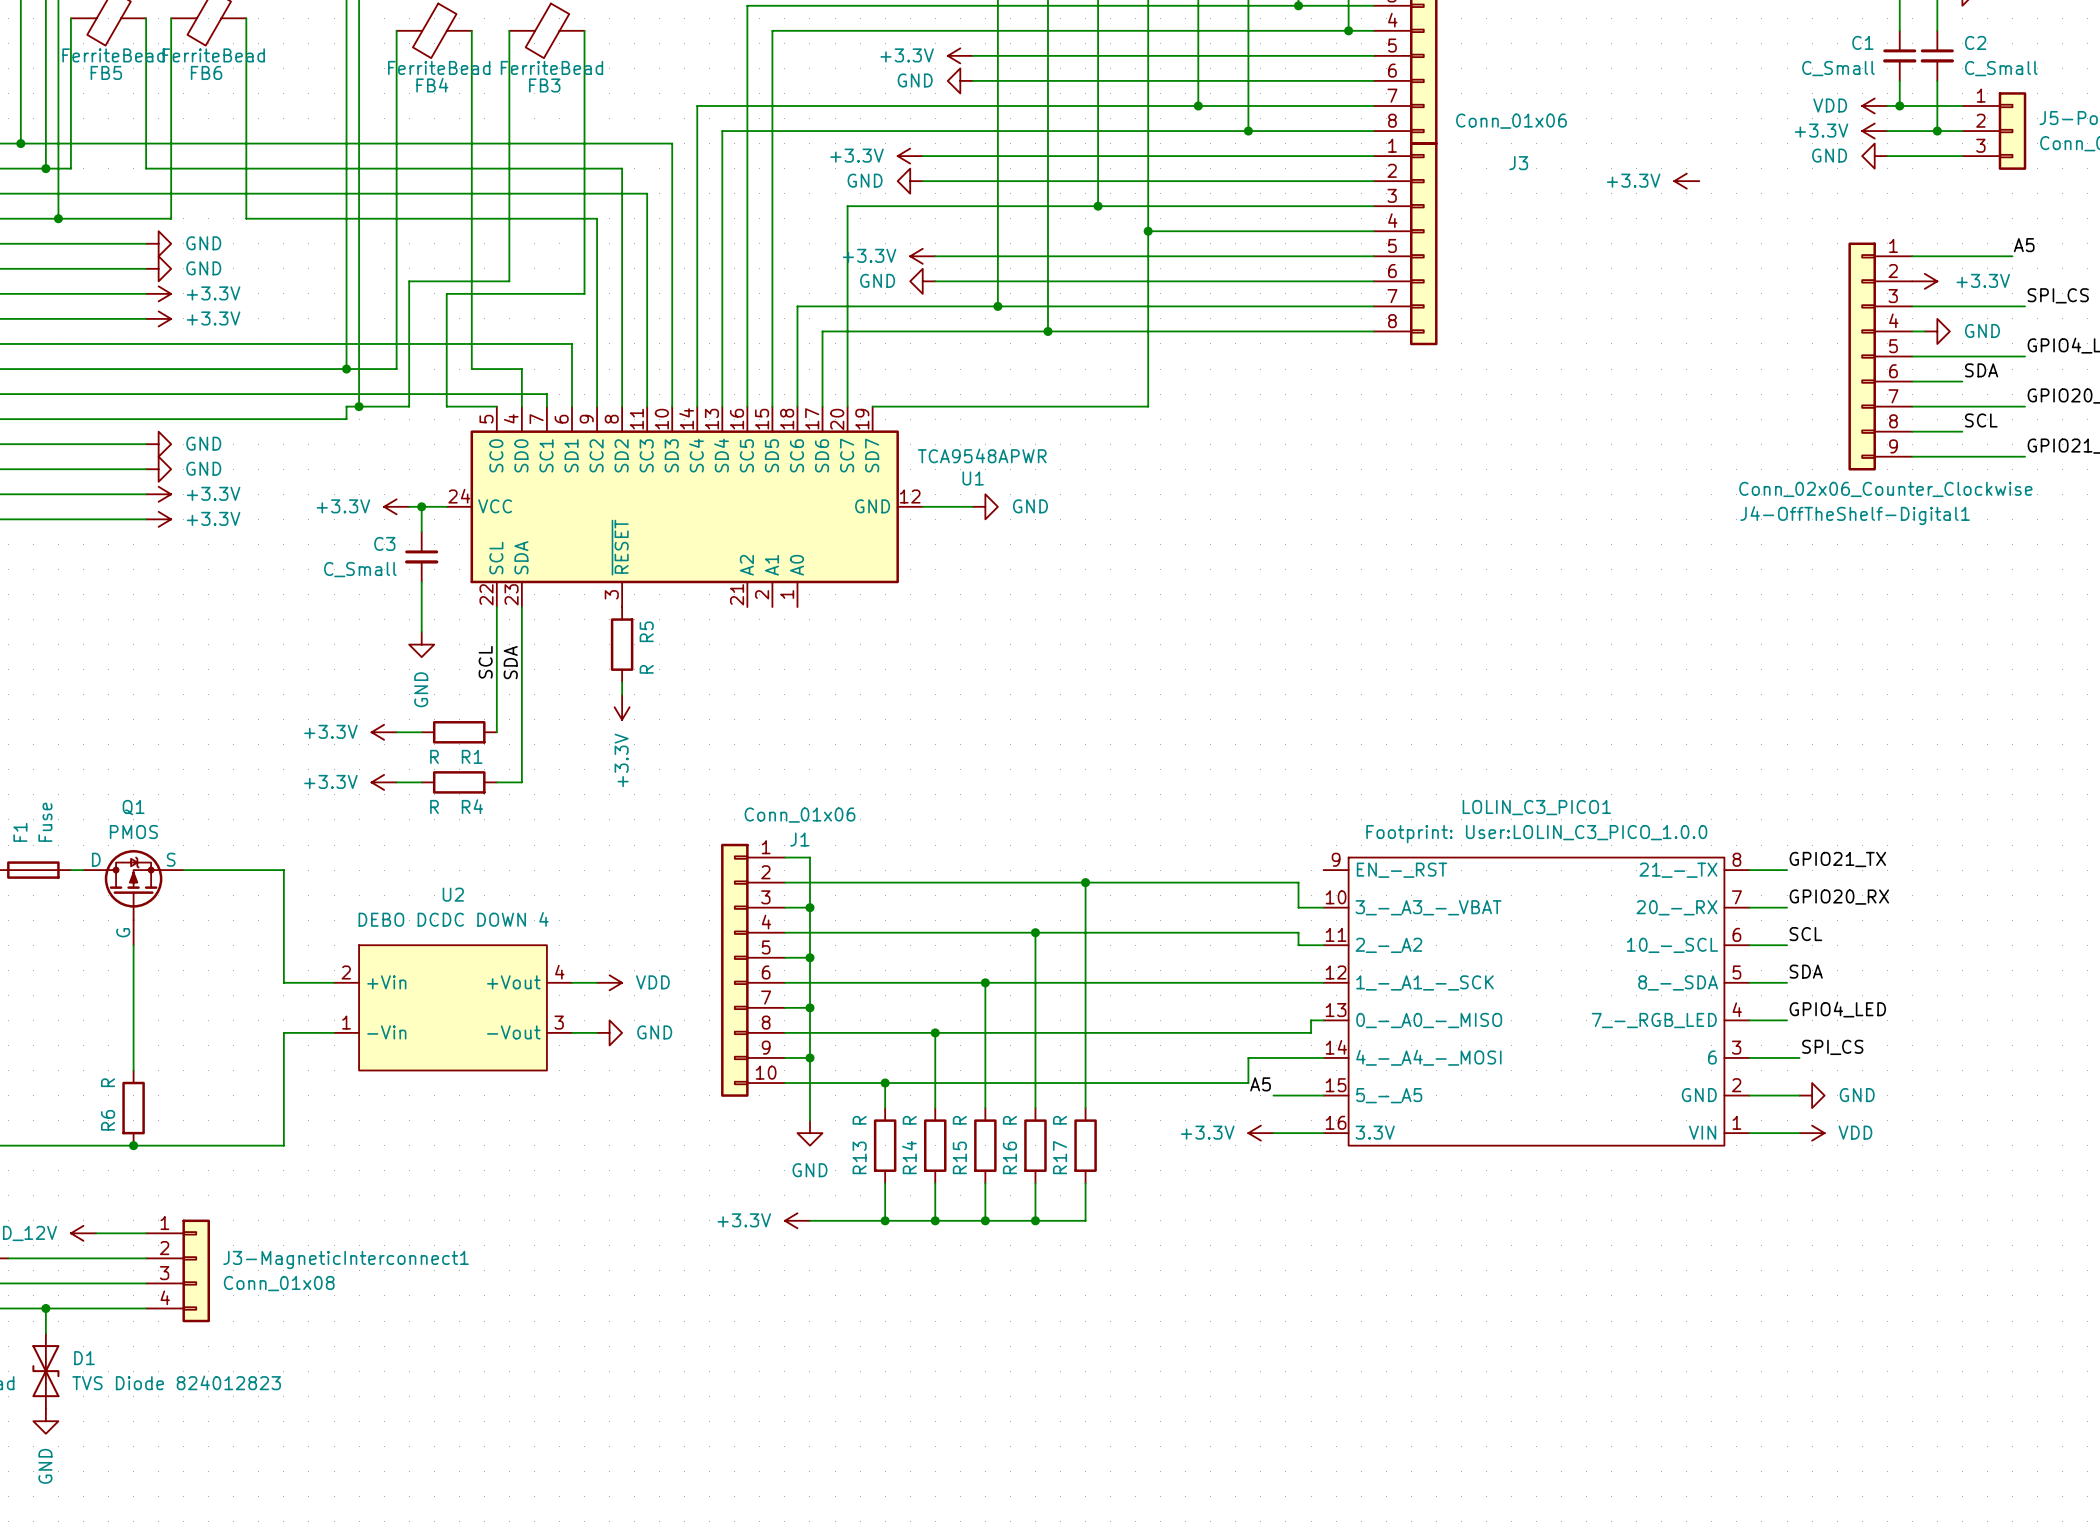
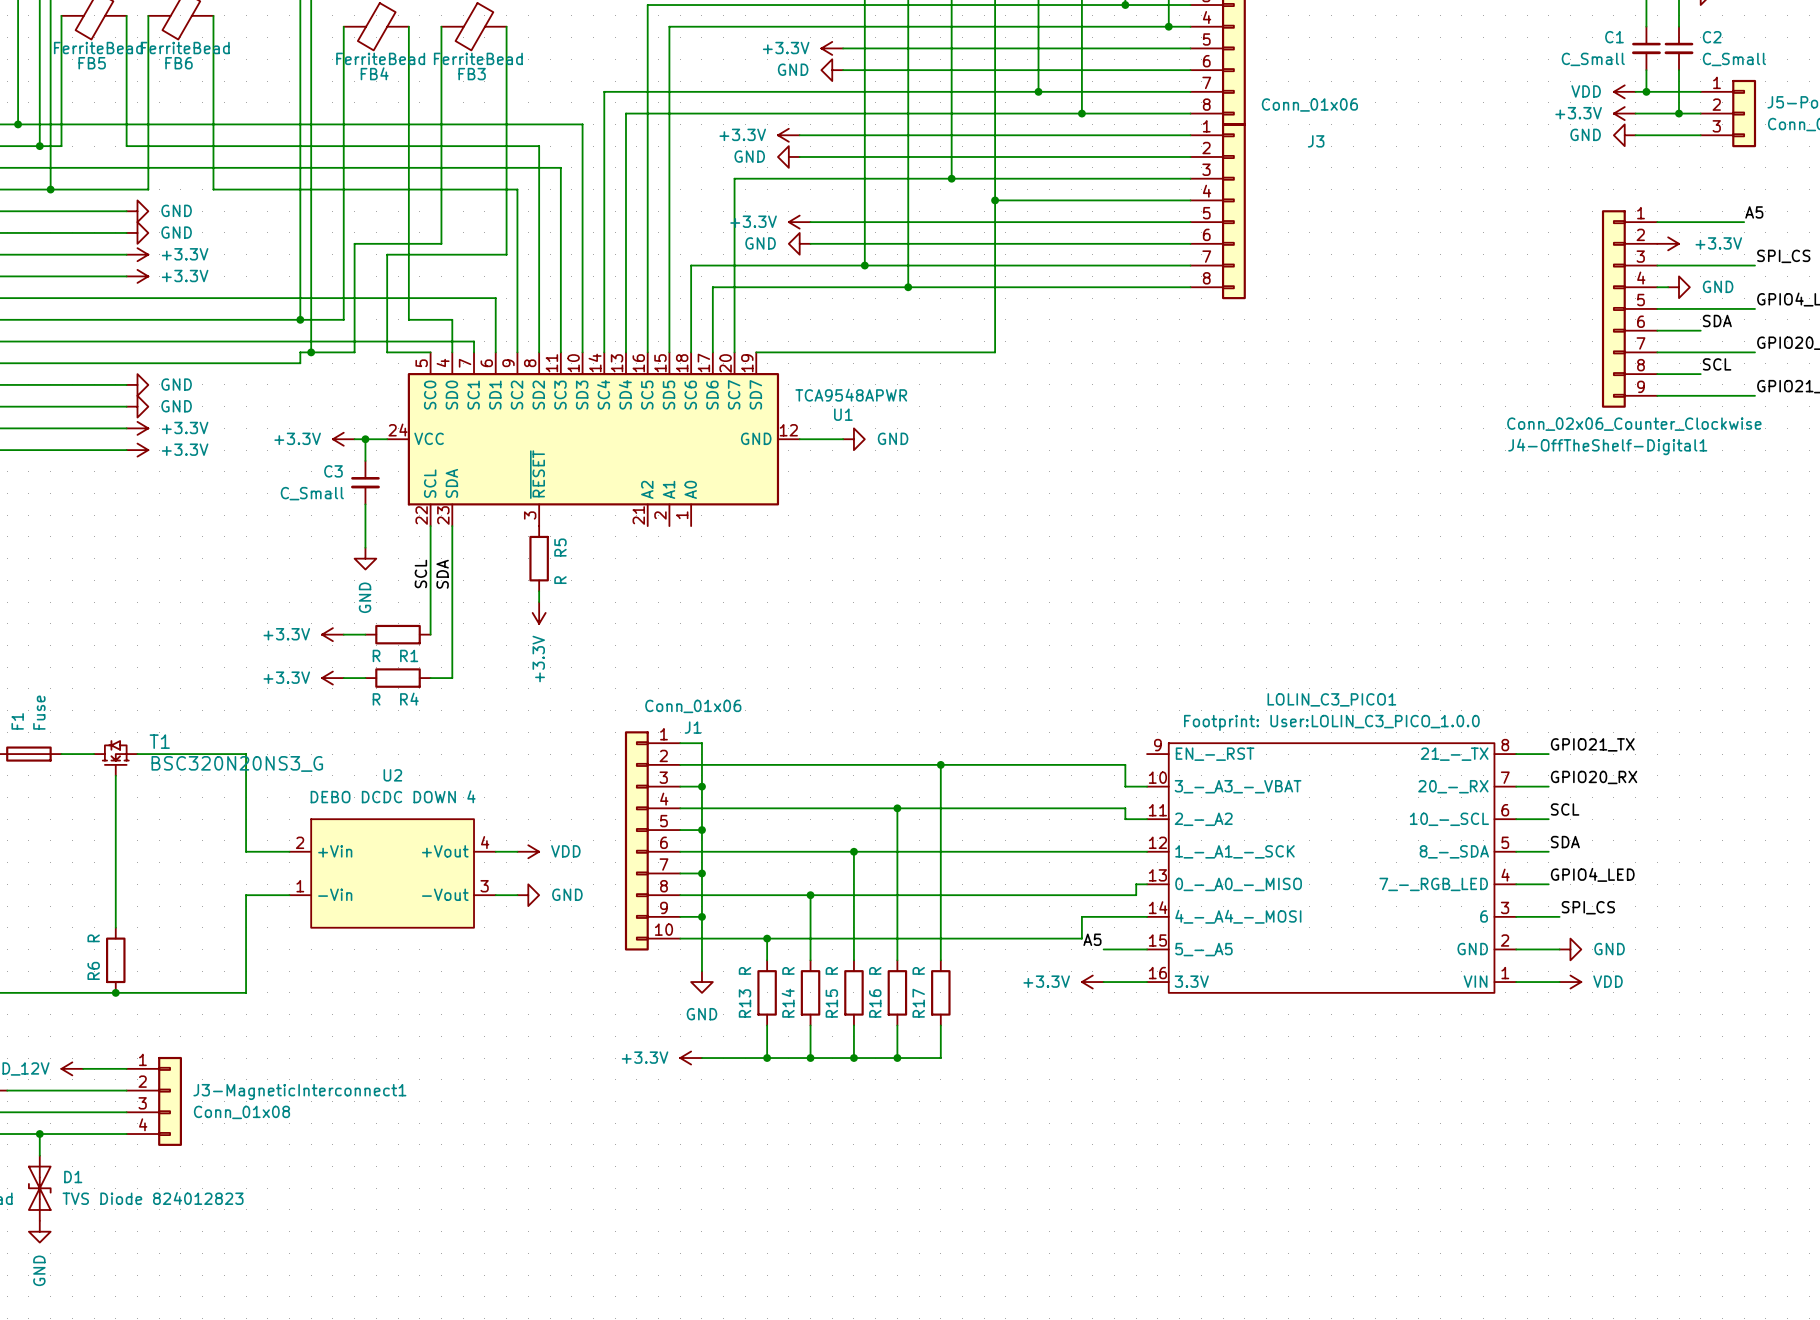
power symbol: +3.3V (1686, 181) -> none
T1: none -> BSC320N20NS3_G (115, 758)
Q1: PMOS (133, 897) -> none

